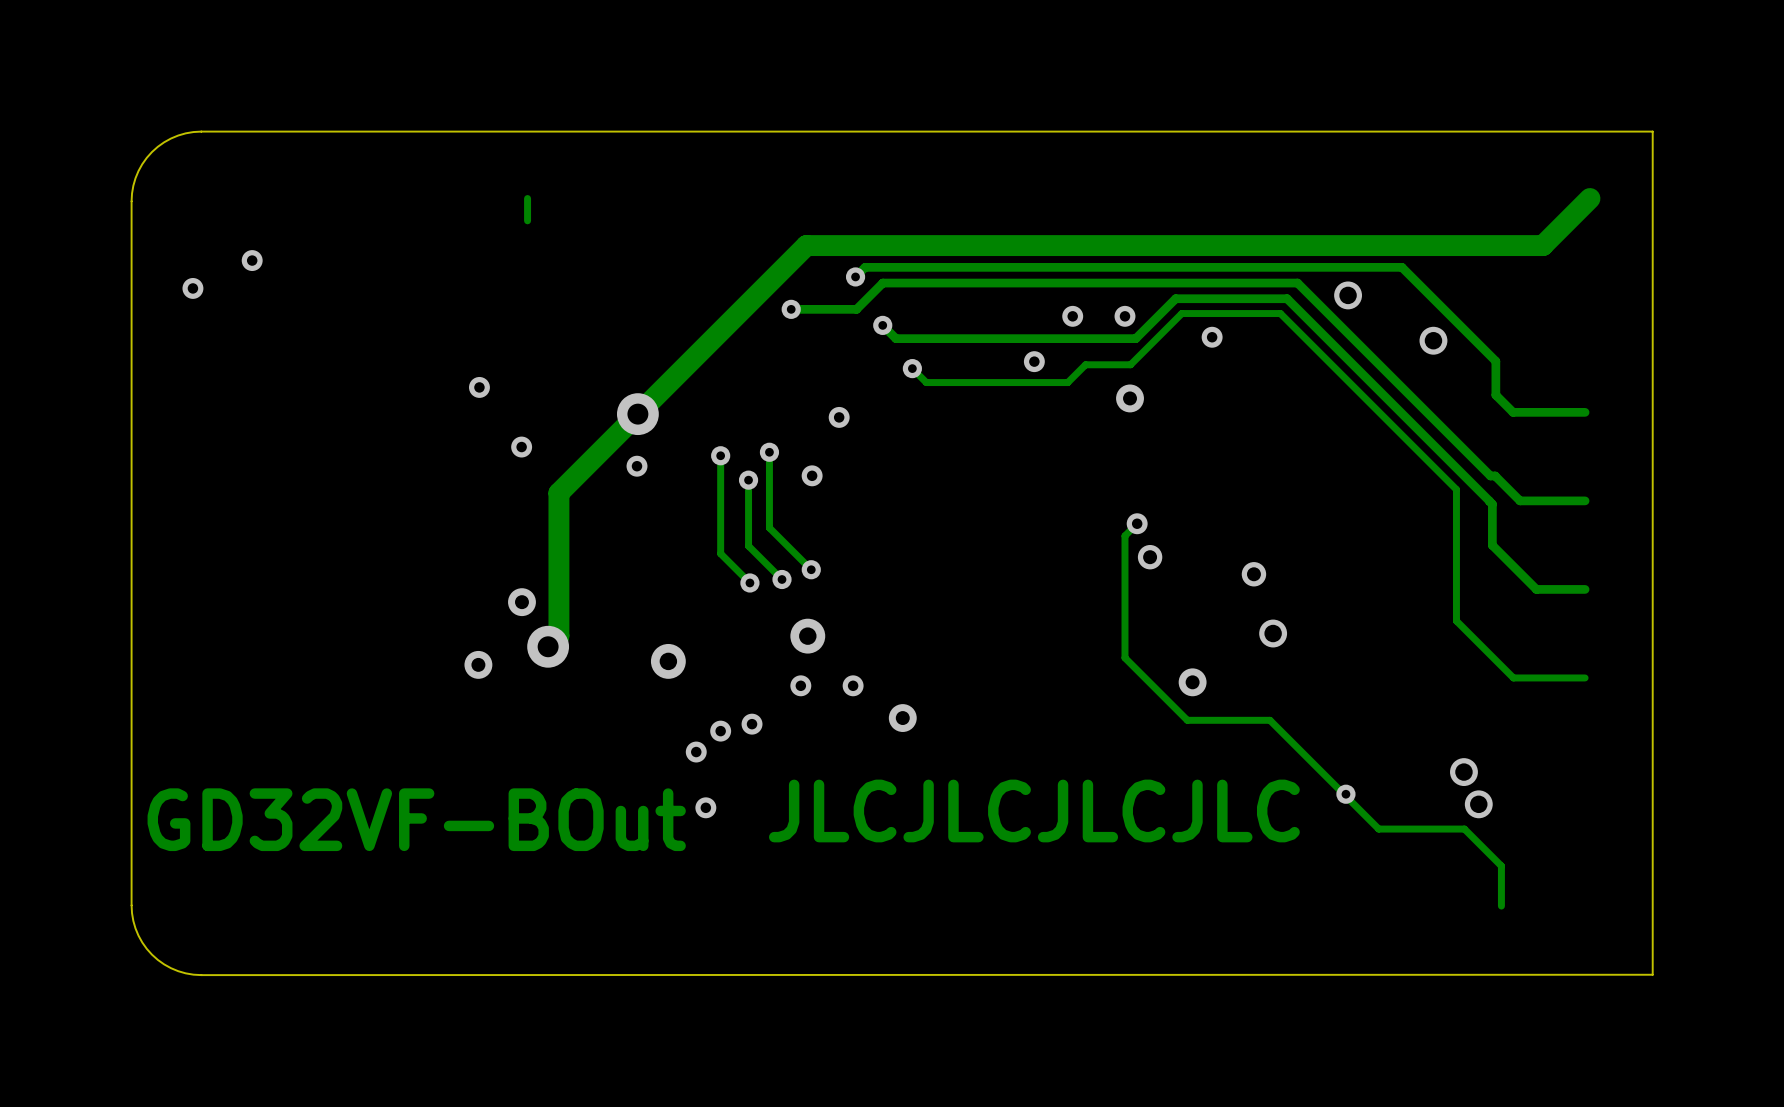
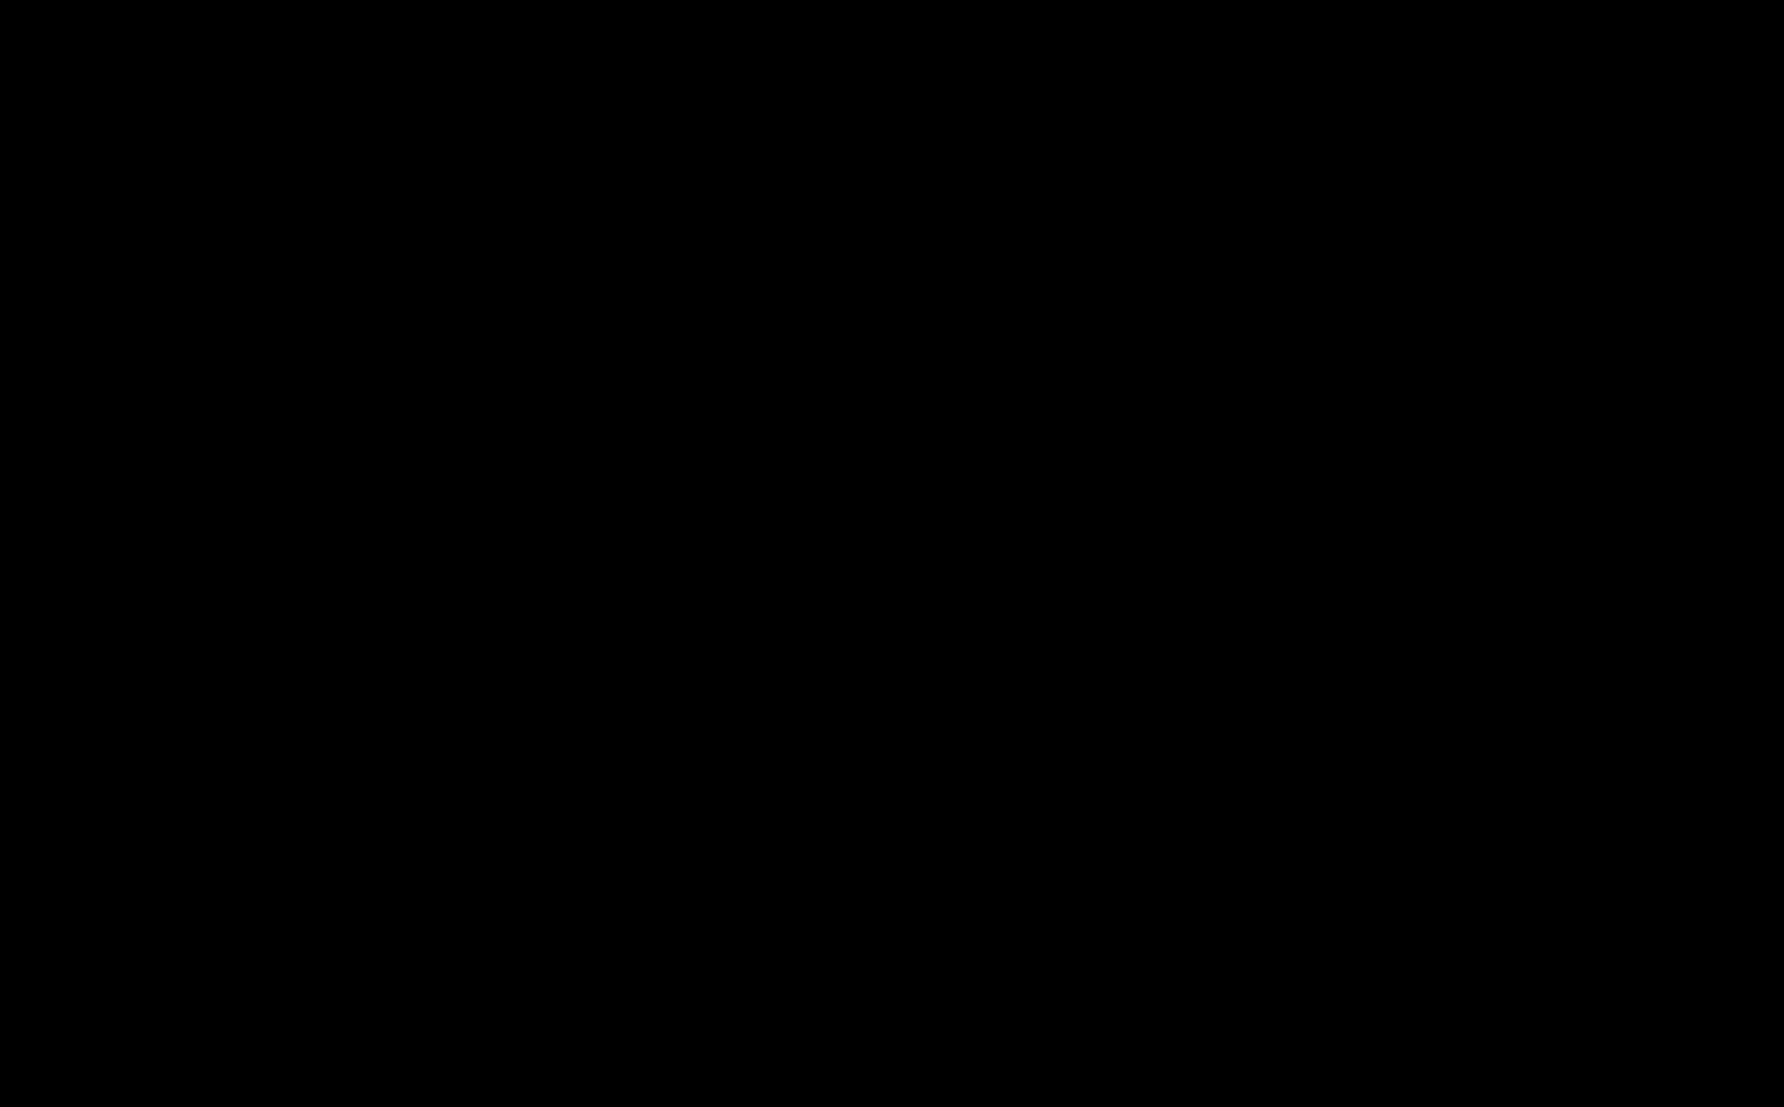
board edge: (1652, 131) (1652, 974) (201, 975) (178, 971) (164, 964) (146, 948) (138, 935) (133, 920) (131, 905) (131, 201) (135, 178) (142, 164) (152, 152) (171, 138) (185, 133) (201, 131) (1652, 131) -> none
track: (527, 198) (527, 220) -> none
track: (1589, 198) (1542, 245) (806, 245) (558, 493) (558, 635) (548, 646) -> none
via: (252, 260) -> none
track: (855, 276) (865, 267) (1401, 267) (1495, 361) (1495, 395) (1513, 412) (1585, 412) -> none
via: (855, 276) -> none
via: (192, 288) -> none
via: (1348, 295) -> none
track: (791, 309) (856, 309) (882, 283) (1297, 283) (1490, 475) (1495, 475) (1520, 500) (1585, 500) -> none
via: (791, 309) -> none
via: (1072, 316) -> none
via: (1124, 316) -> none
track: (882, 325) (895, 338) (1135, 338) (1175, 298) (1287, 298) (1489, 501) -> none
via: (882, 325) -> none
via: (1212, 337) -> none
via: (1433, 340) -> none
via: (1034, 361) -> none
track: (912, 368) (926, 382) (1067, 382) (1085, 364) (1130, 364) (1181, 313) (1280, 313) (1456, 489) (1456, 620) (1513, 677) (1585, 677) -> none
via: (912, 368) -> none
via: (479, 387) -> none
via: (1130, 398) -> none
via: (637, 414) -> none
via: (839, 417) -> none
via: (521, 447) -> none
track: (769, 452) (769, 527) (811, 569) -> none
via: (769, 452) -> none
track: (720, 455) (720, 553) (749, 582) -> none
via: (720, 455) -> none
via: (637, 466) -> none
via: (812, 475) -> none
track: (748, 480) (748, 546) (782, 579) -> none
via: (748, 480) -> none
track: (1489, 501) (1492, 504) (1492, 545) (1536, 589) (1585, 589) -> none
track: (1137, 523) (1124, 535) (1124, 657) (1187, 720) (1269, 720) (1378, 829) (1464, 829) (1501, 866) (1501, 906) -> none
via: (1137, 523) -> none
via: (1150, 557) -> none
via: (811, 569) -> none
via: (1253, 574) -> none
via: (782, 579) -> none
via: (749, 582) -> none
via: (521, 602) -> none
via: (1273, 633) -> none
via: (807, 636) -> none
via: (548, 646) -> none
via: (668, 661) -> none
via: (478, 664) -> none
via: (1192, 682) -> none
via: (800, 685) -> none
via: (853, 685) -> none
via: (902, 718) -> none
via: (752, 724) -> none
via: (720, 731) -> none
via: (696, 752) -> none
via: (1463, 772) -> none
via: (1345, 794) -> none
via: (1478, 804) -> none
via: (705, 807) -> none
text: JLCJLCJLCJLC (1034, 810) -> none
text: GD32VF-BOut (416, 819) -> none

